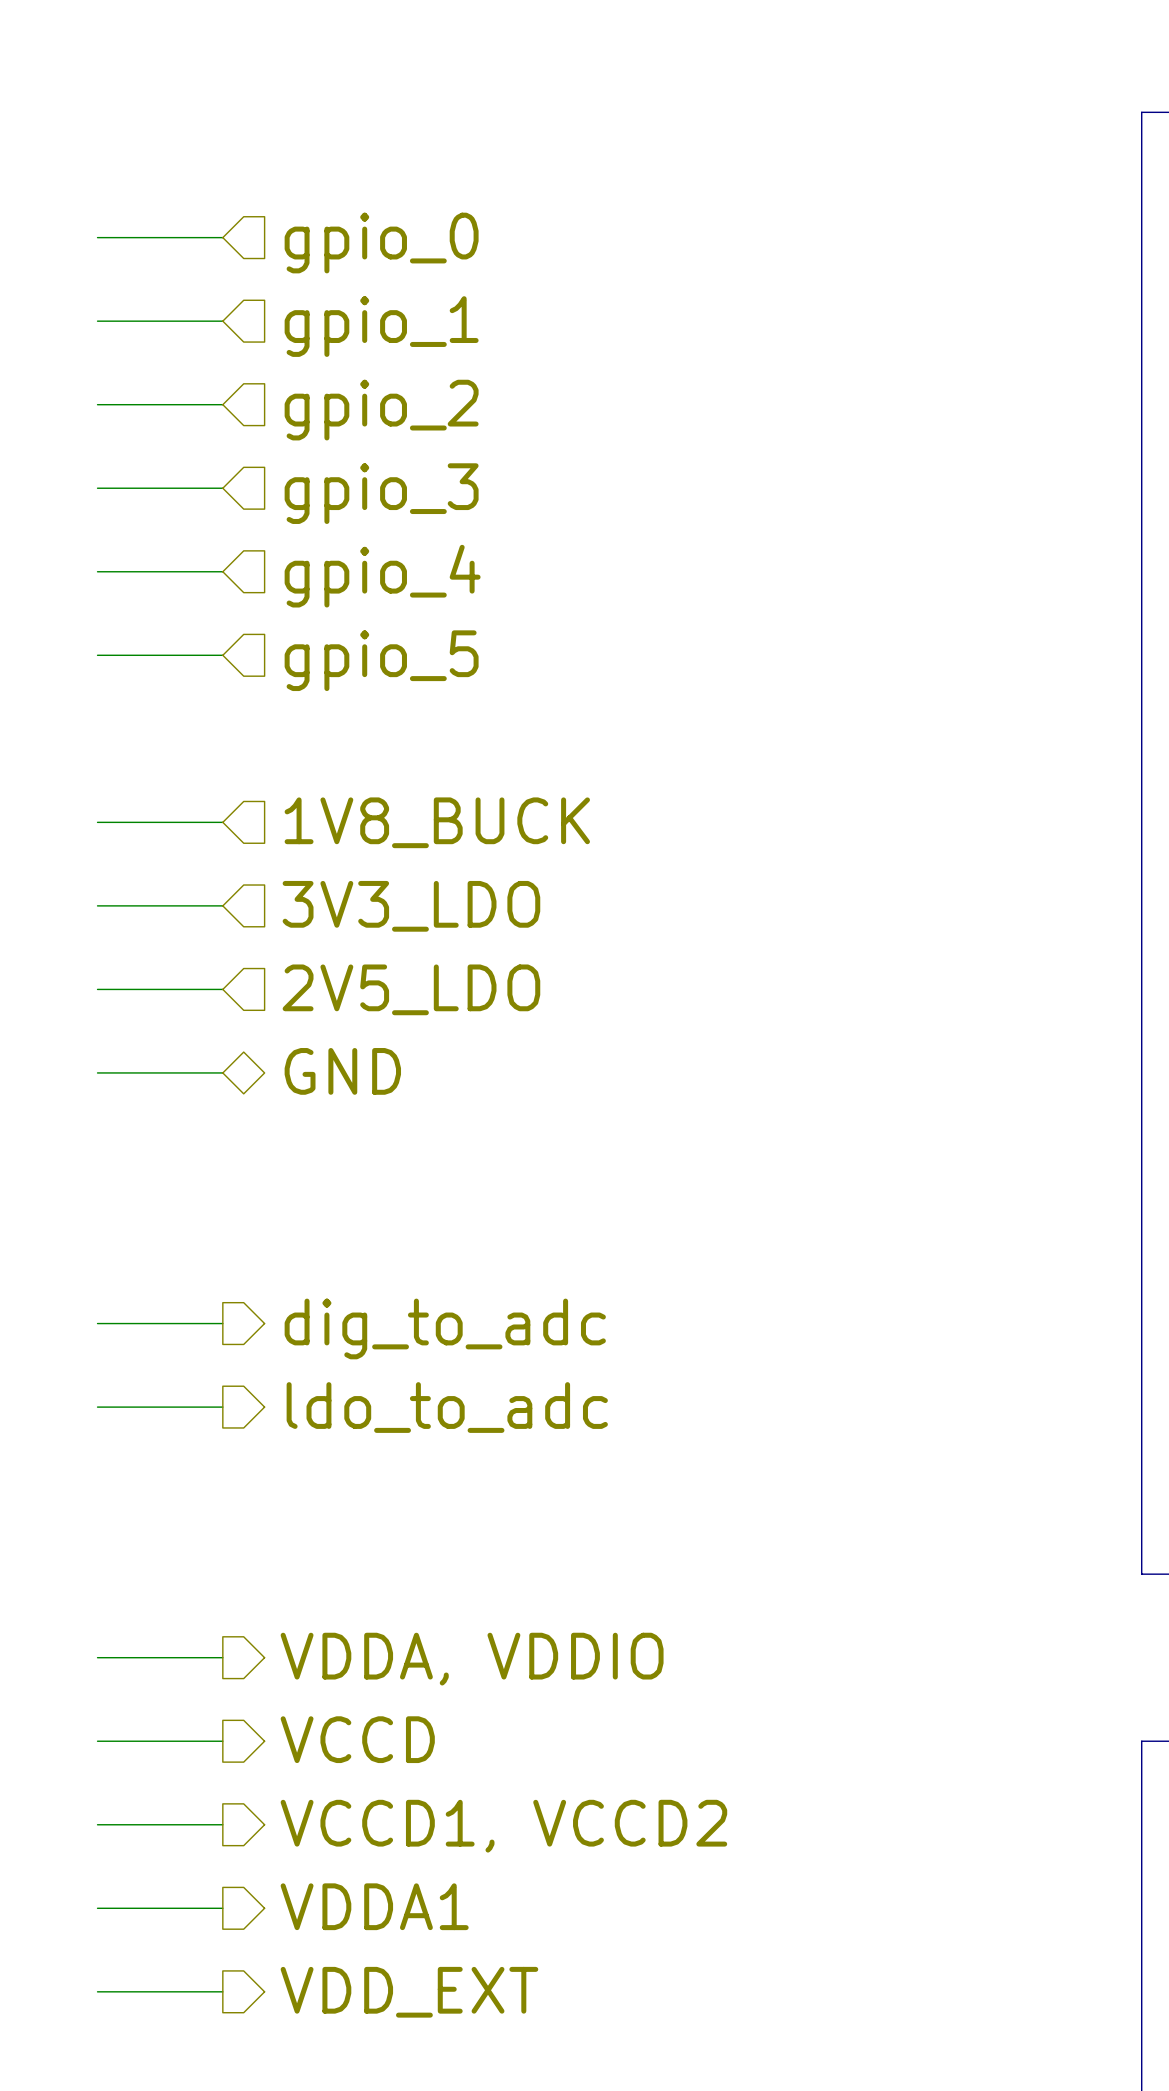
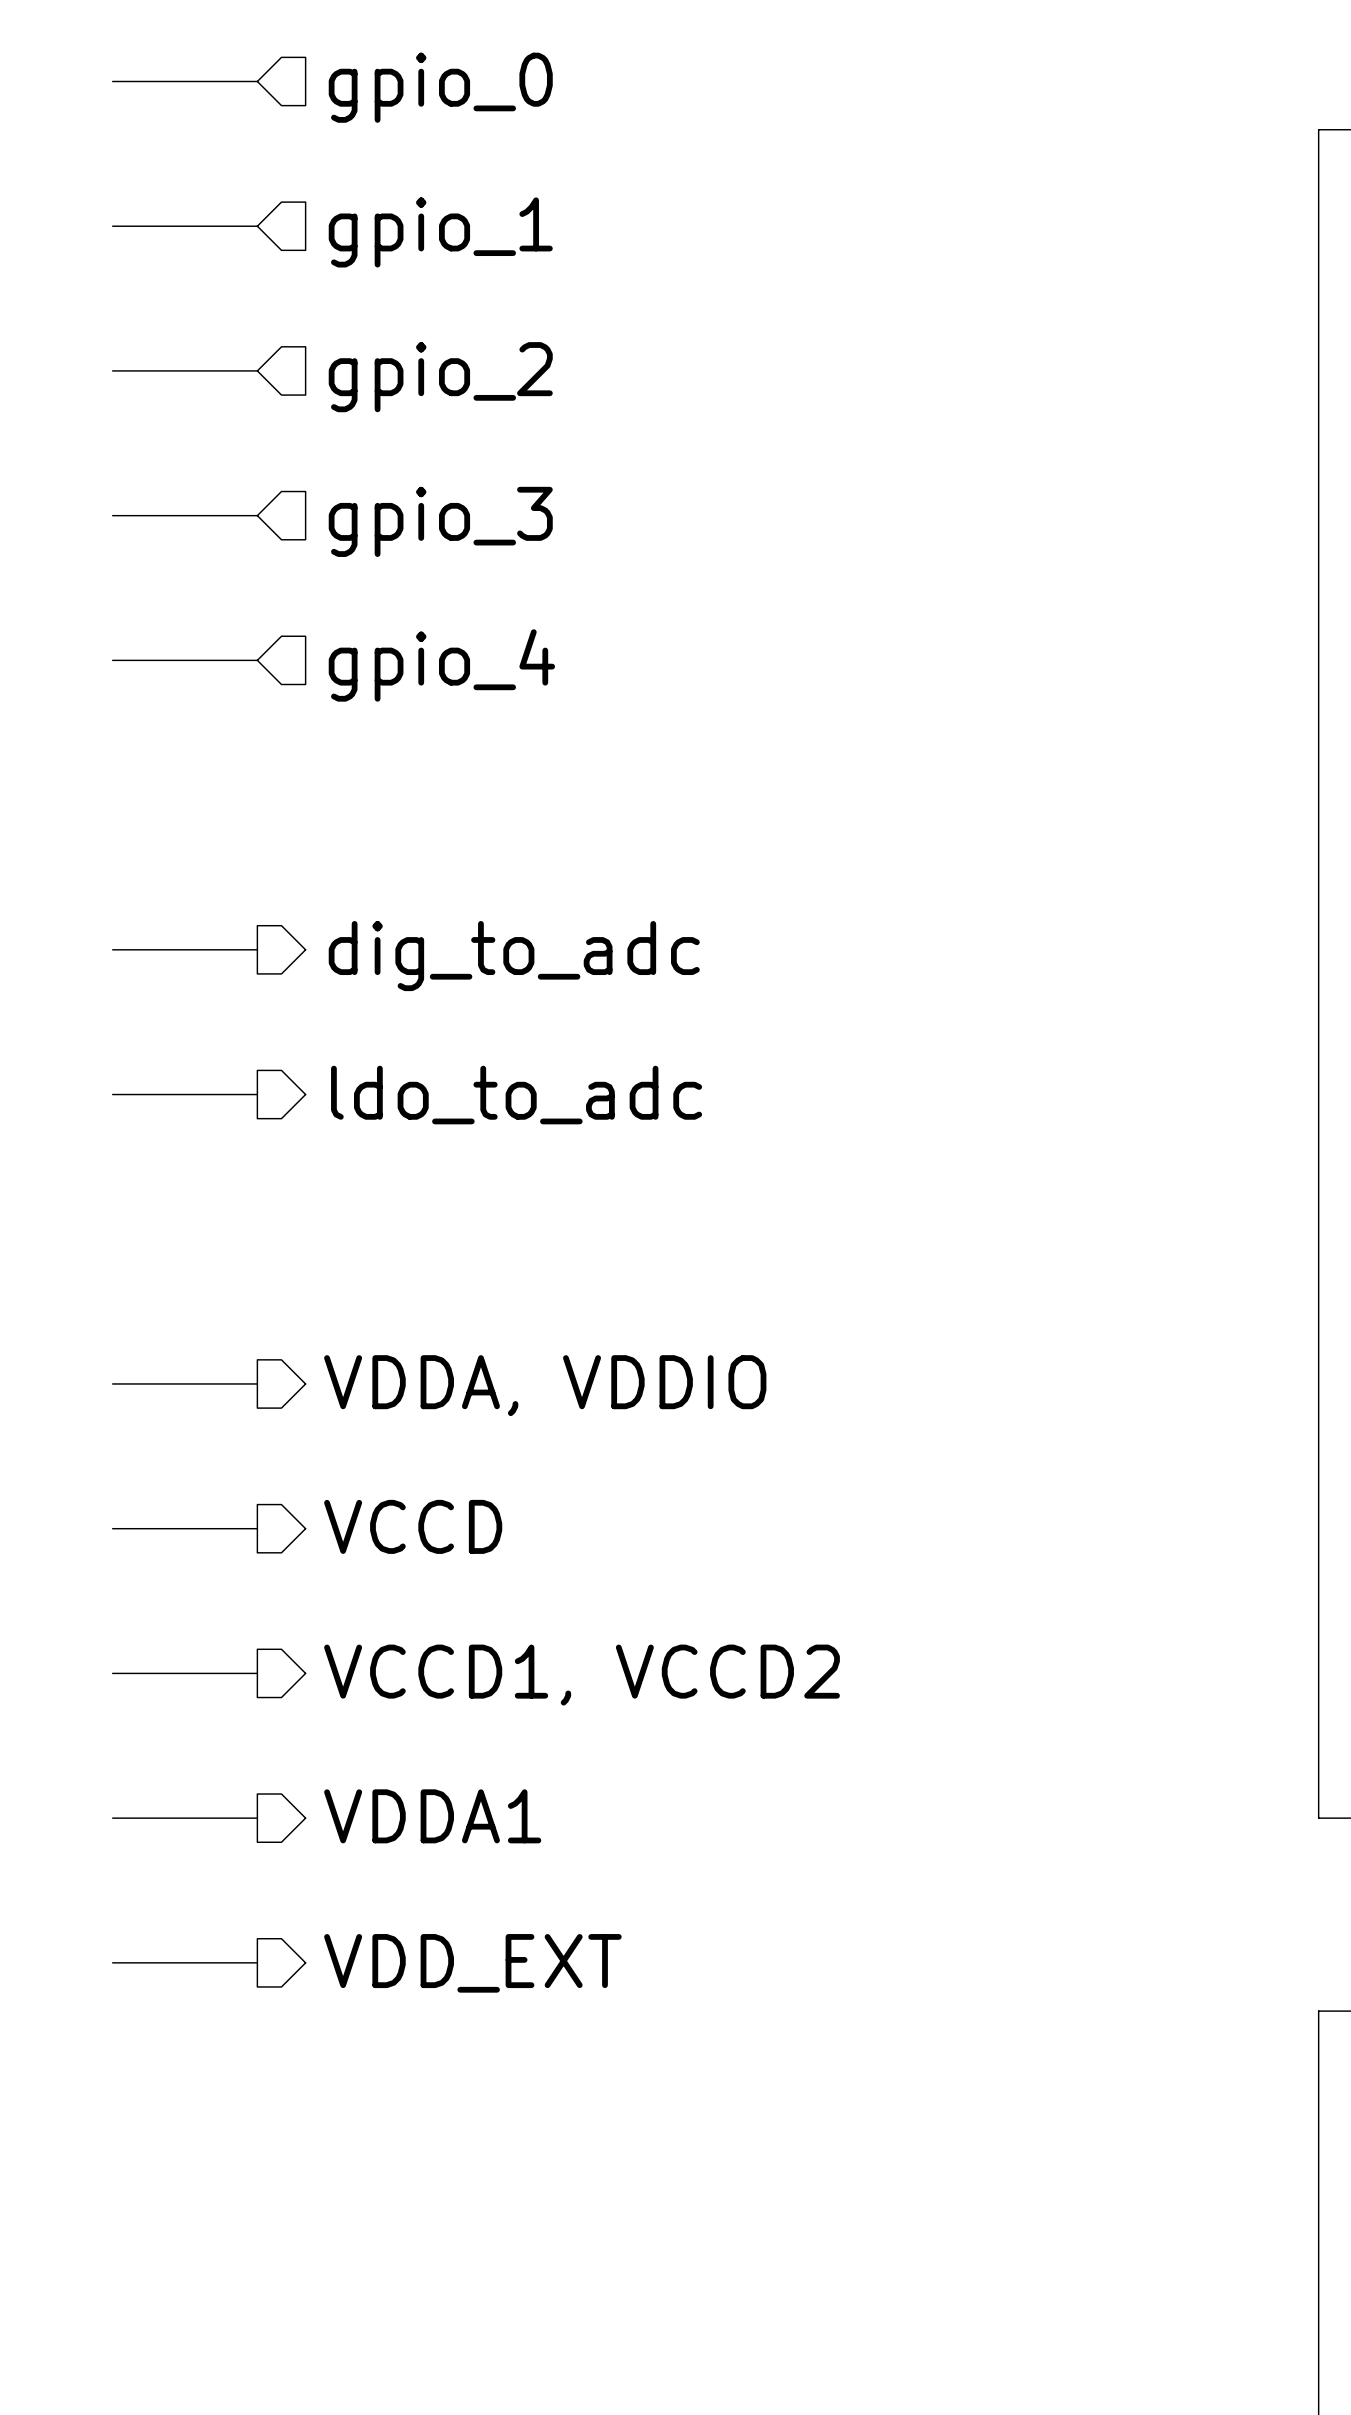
hierarchical label: none -> gpio_1 (440, 232)
wire: (97, 237) (222, 237) -> (112, 81) (257, 81)
hierarchical label position: gpio_0 (381, 243) -> gpio_0 (440, 87)
hierarchical label: gpio_1 (381, 326) -> gpio_2 (440, 377)
wire: (97, 404) (222, 404) -> (112, 226) (257, 226)
hierarchical label: gpio_2 (381, 410) -> none
wire: (97, 488) (222, 488) -> none
hierarchical label position: gpio_3 (381, 493) -> gpio_3 (440, 521)
wire: (97, 655) (222, 655) -> (112, 515) (257, 515)
hierarchical label: gpio_5 (381, 660) -> none
hierarchical label shape: input (437, 822) -> output (514, 956)
hierarchical label: 1V8_BUCK (437, 822) -> dig_to_adc (514, 956)
wire: (97, 905) (222, 905) -> (112, 1094) (257, 1094)
hierarchical label: 3V3_LDO (411, 906) -> none
wire: (97, 989) (222, 989) -> none
hierarchical label: 2V5_LDO (411, 989) -> none
hierarchical label: GND (342, 1071) -> none
wire: (97, 1072) (222, 1072) -> none
hierarchical label: dig_to_adc (445, 1328) -> VCCD (413, 1526)
wire: (97, 1407) (222, 1407) -> (112, 1383) (257, 1383)
hierarchical label position: ldo_to_adc (447, 1407) -> ldo_to_adc (516, 1095)
wire: (97, 1657) (222, 1657) -> (112, 1673) (257, 1673)
hierarchical label position: VDDA, VDDIO (472, 1659) -> VDDA, VDDIO (545, 1385)
hierarchical label: VCCD (357, 1739) -> none
wire: (97, 1741) (222, 1741) -> (112, 1818) (257, 1818)
wire: (97, 1824) (222, 1824) -> none
hierarchical label position: VCCD1, VCCD2 (503, 1826) -> VCCD1, VCCD2 (582, 1675)
hierarchical label position: VDDA1 (374, 1906) -> VDDA1 (432, 1816)
wire: (97, 1908) (222, 1908) -> (112, 1962) (257, 1962)
wire: (97, 1991) (222, 1991) -> none
hierarchical label position: VDD_EXT (409, 1992) -> VDD_EXT (472, 1963)

